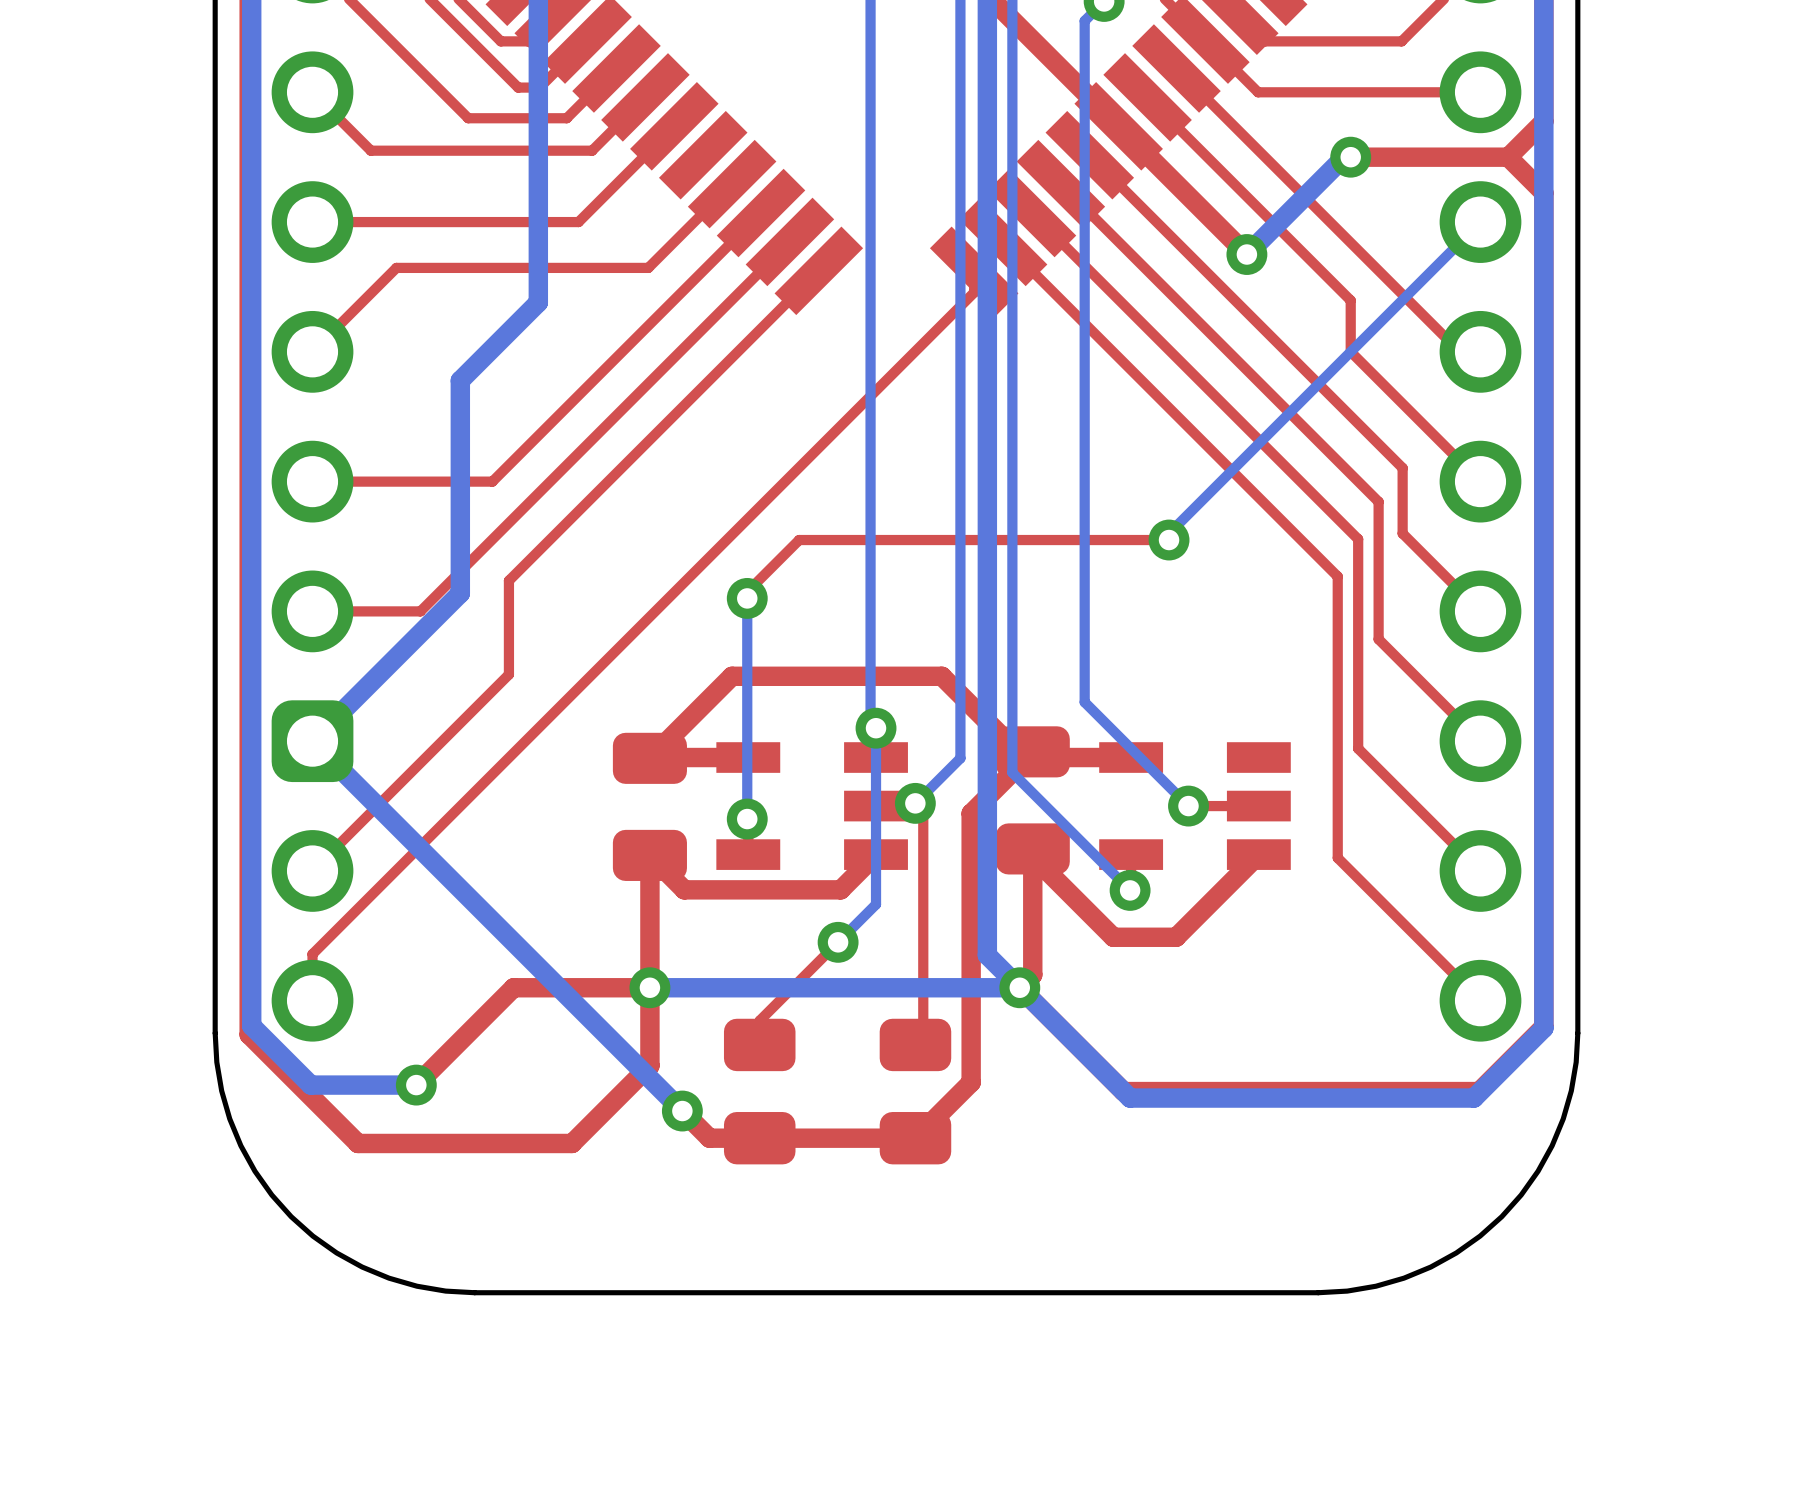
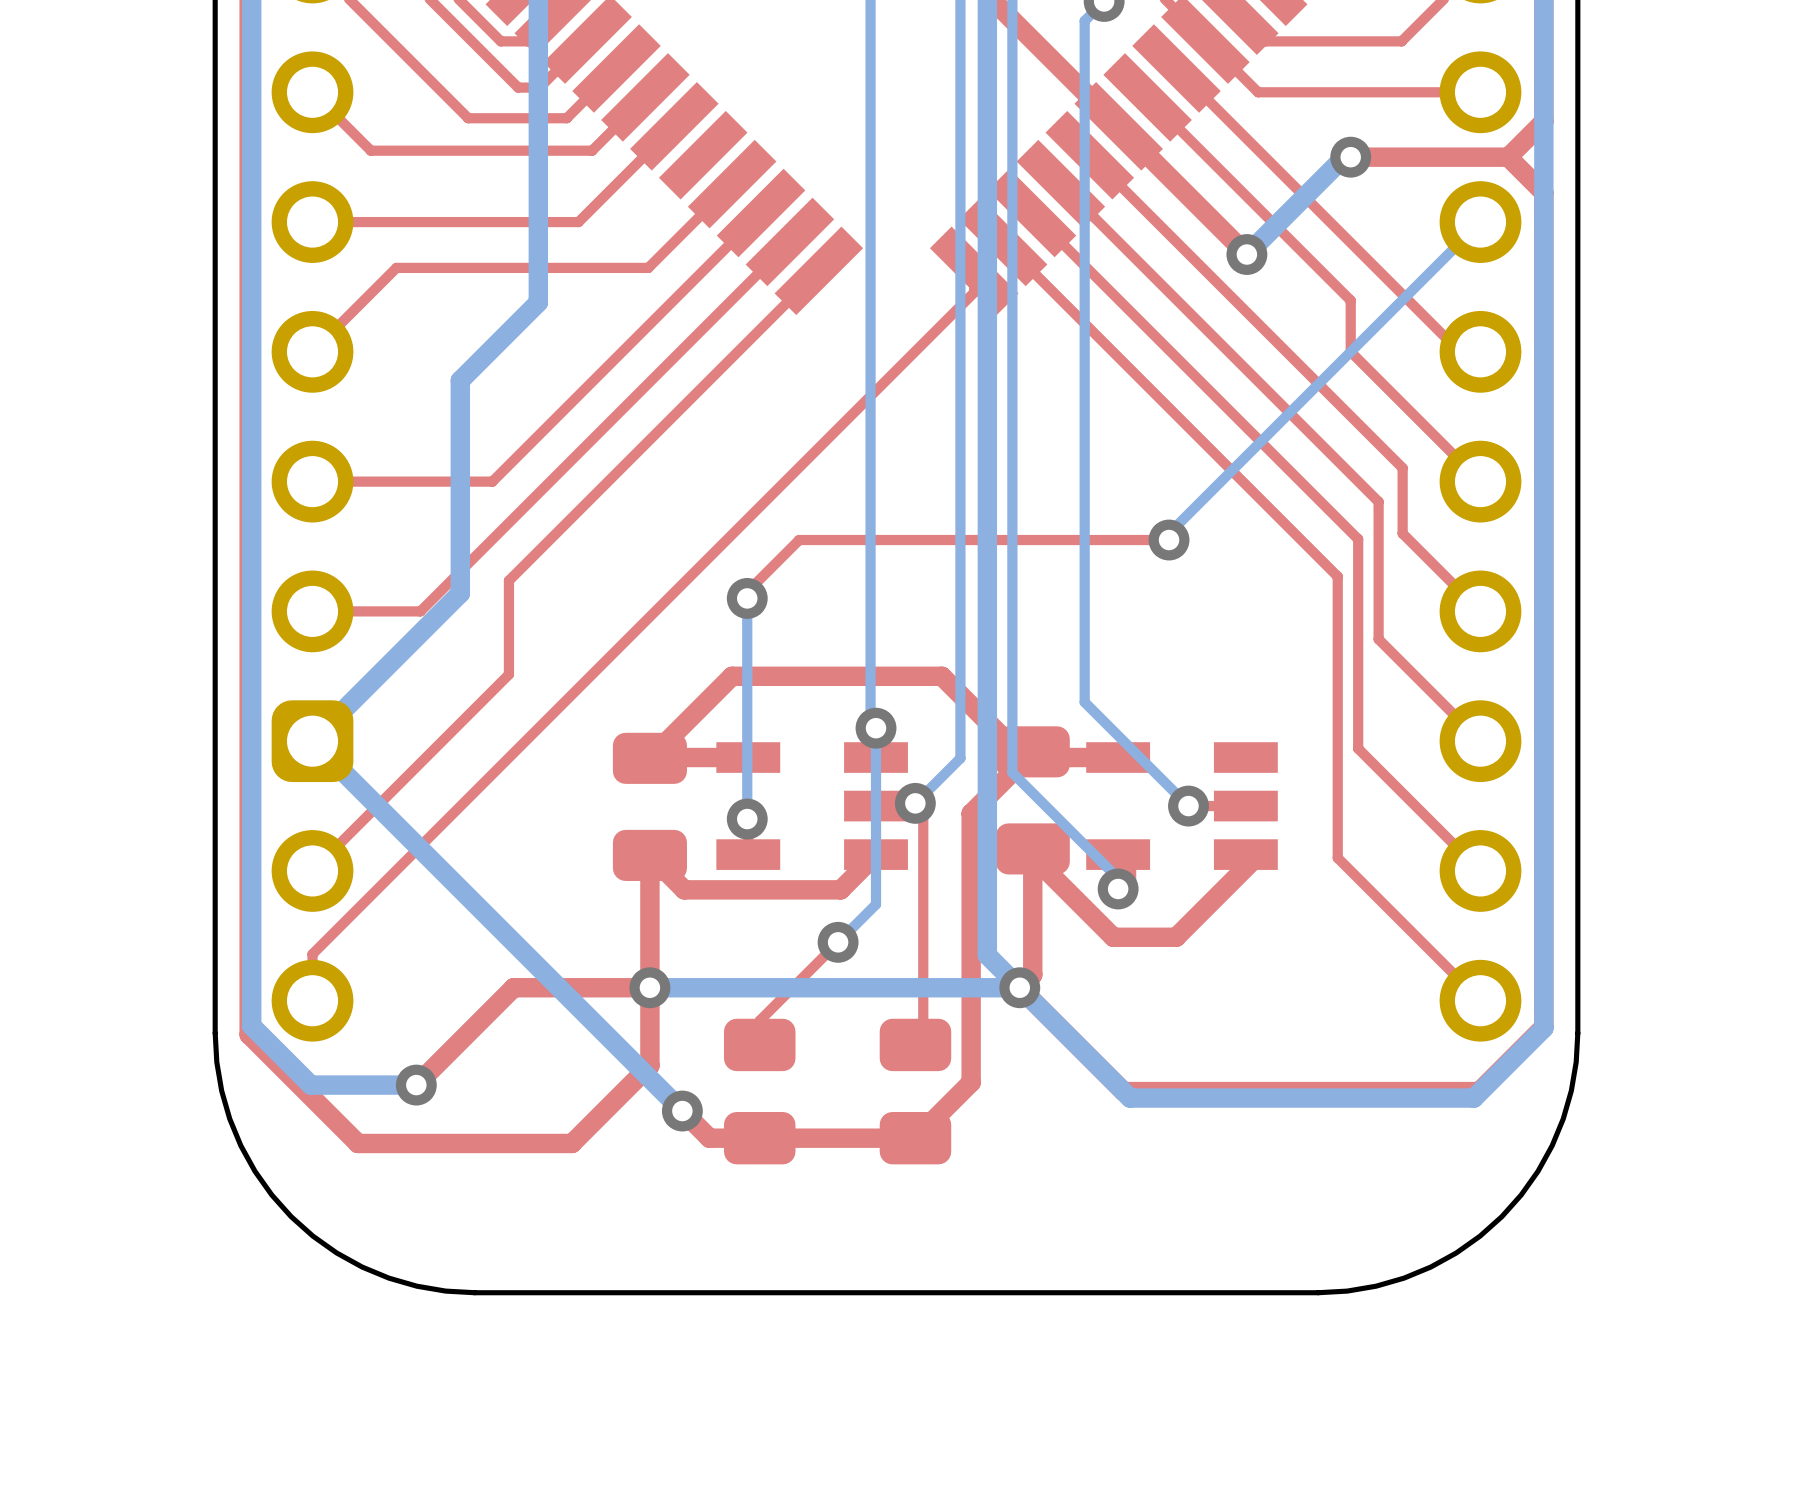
part position: (1194, 806) -> (1182, 806)
via position: (1130, 890) -> (1118, 888)

